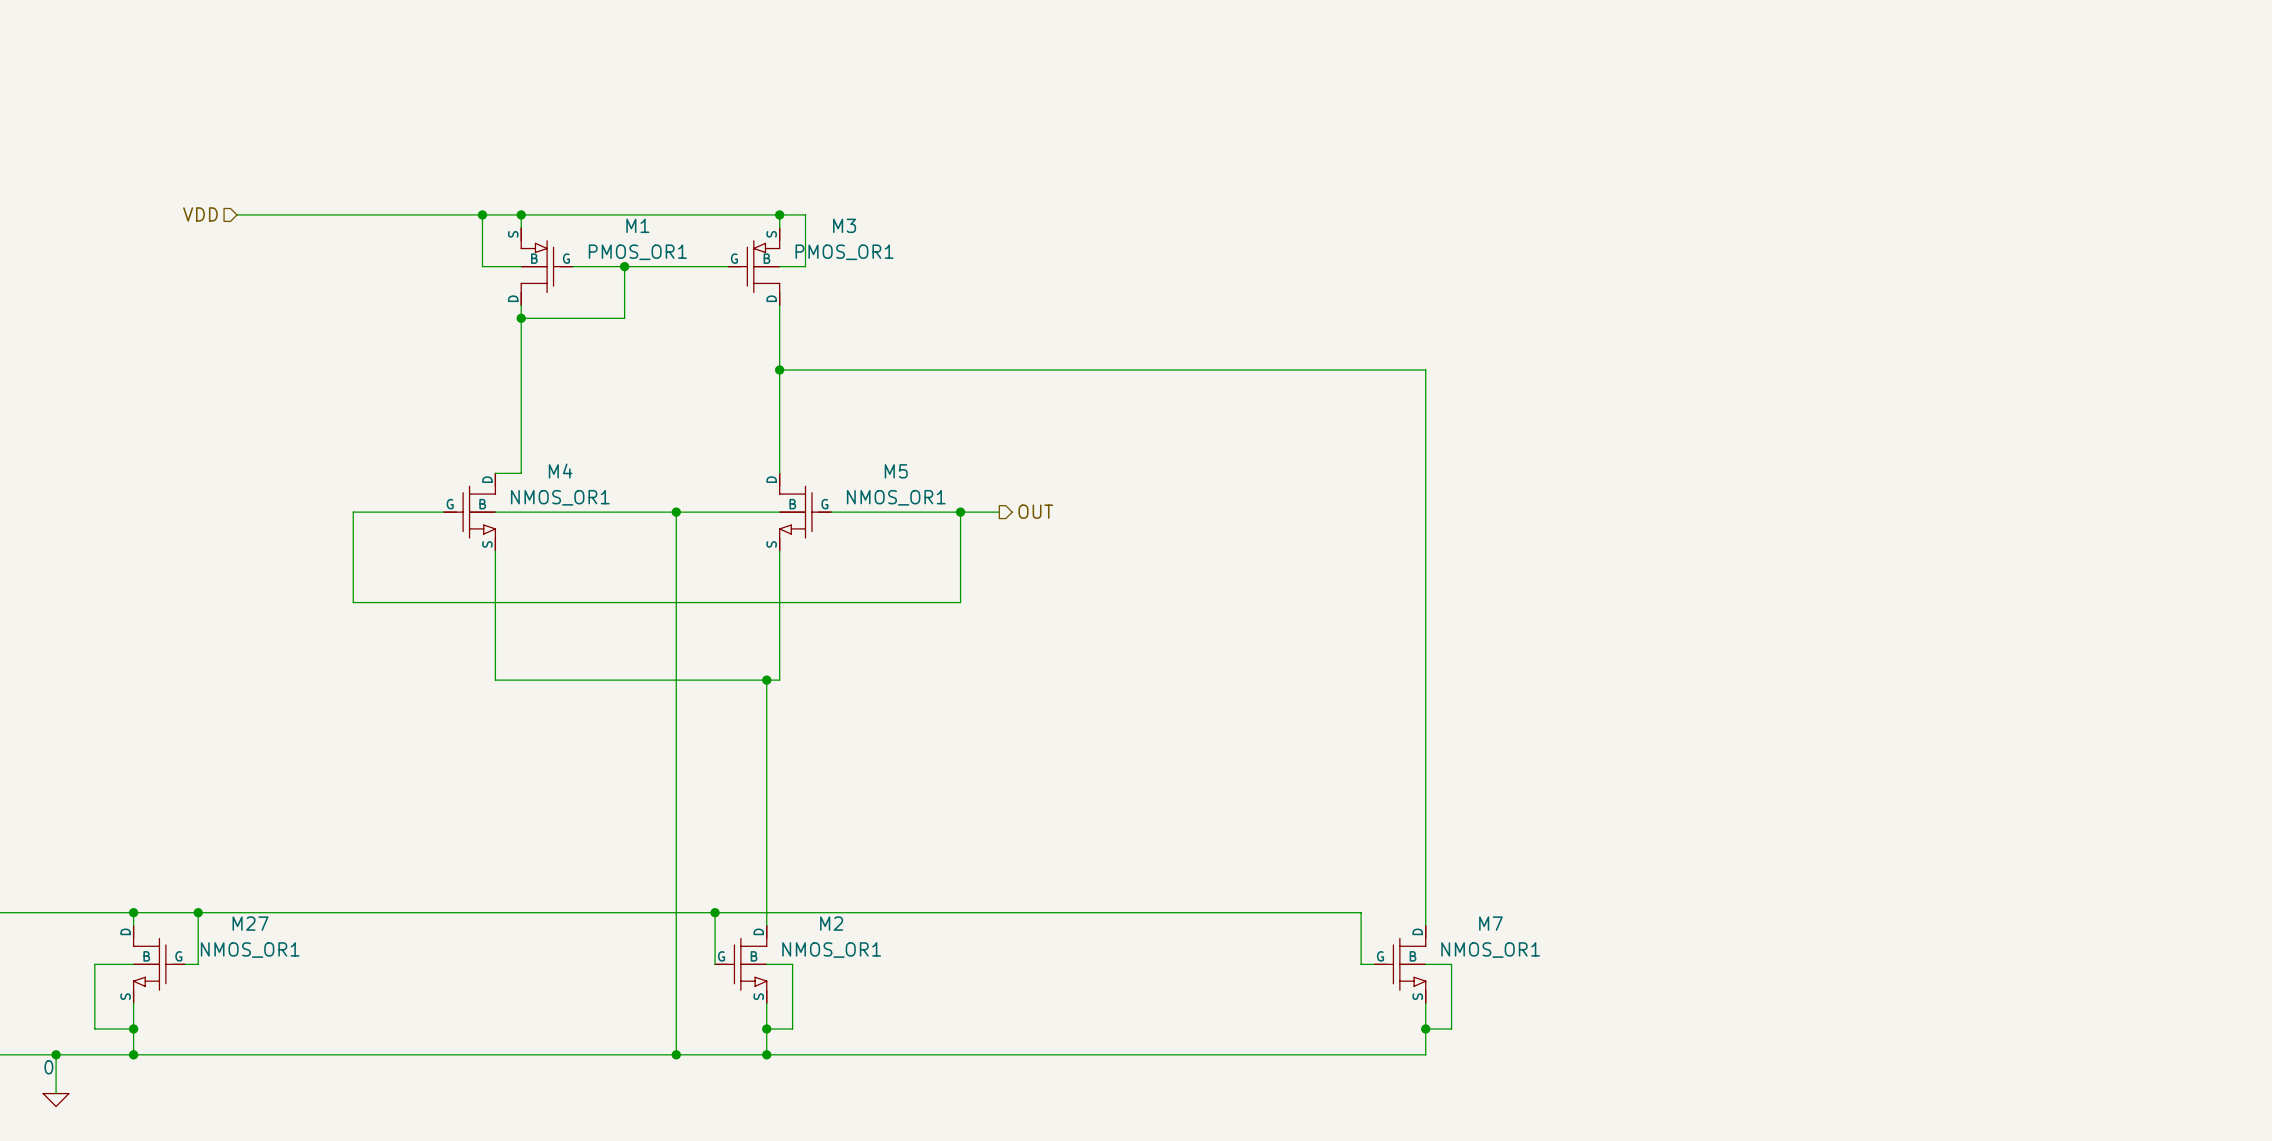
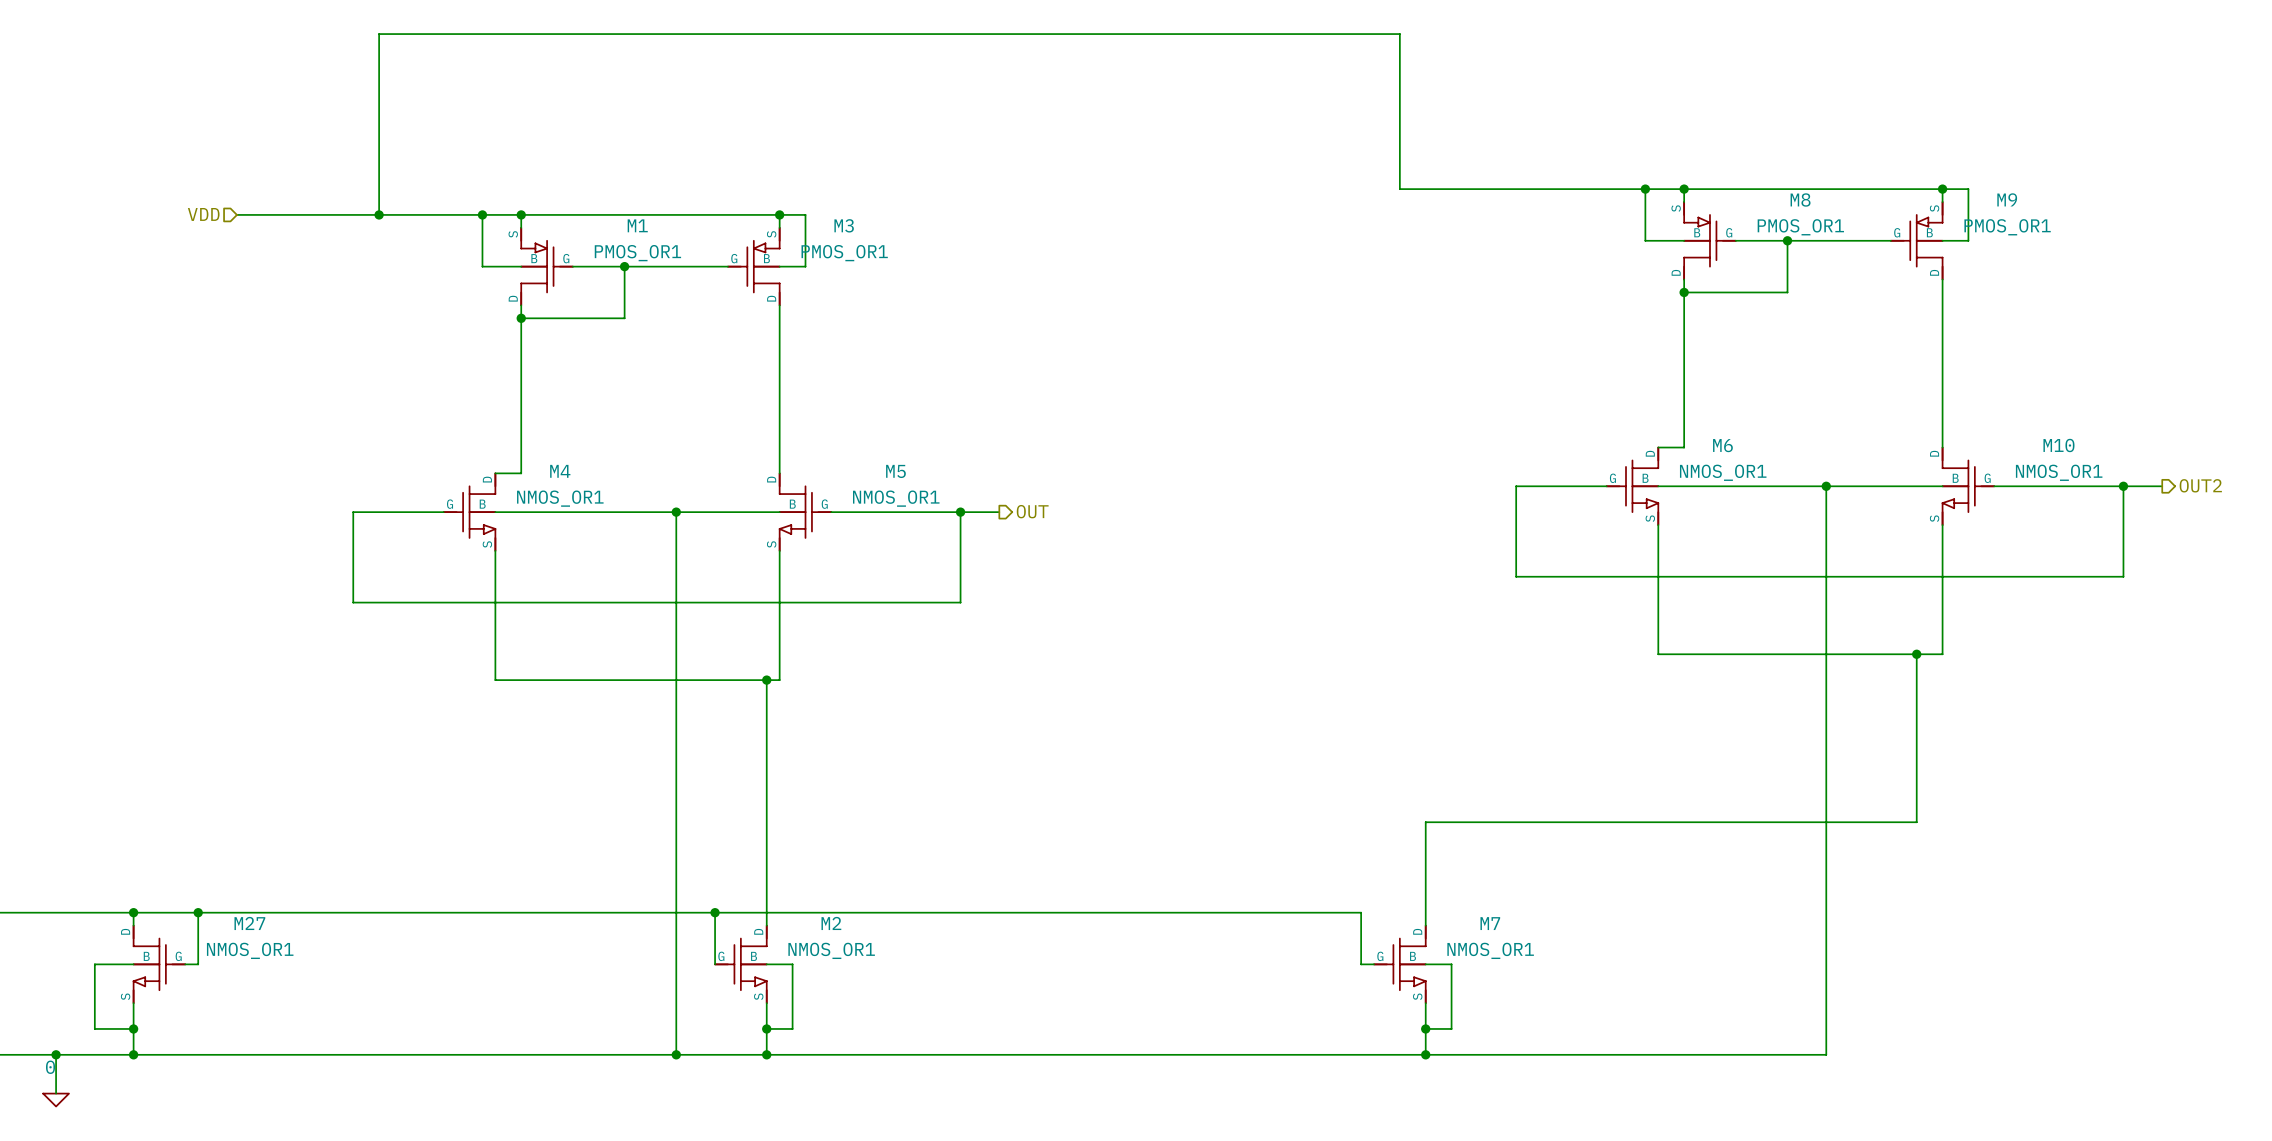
wire: none -> (1645, 189) (1645, 240) (1684, 240)
junction: none -> (1645, 189)
wire: none -> (1684, 189) (1684, 202)
junction: none -> (1684, 189)
wire: none -> (1942, 189) (1942, 202)
junction: none -> (1942, 189)
wire: none -> (379, 214) (379, 34) (1399, 34) (1399, 189) (1968, 189) (1968, 240) (1942, 240)
junction: none -> (379, 214)
M8: none -> PMOS_OR1 (1709, 240)
wire: none -> (1735, 240) (1890, 240)
wire: none -> (1787, 240) (1787, 292) (1684, 292)
junction: none -> (1787, 240)
M9: none -> PMOS_OR1 (1916, 240)
wire: none -> (1684, 279) (1684, 447) (1658, 447)
wire: none -> (1942, 279) (1942, 447)
junction: none -> (1684, 292)
wire: (779, 370) (1425, 370) (1425, 822) -> (1916, 654) (1916, 822) (1425, 822)
junction: (779, 370) -> none
hierarchical label: none -> OUT2 (2200, 485)
wire: none -> (1606, 486) (1516, 486) (1516, 576) (2123, 576) (2123, 486)
M6: none -> NMOS_OR1 (1632, 486)
wire: none -> (1658, 486) (1942, 486)
wire: none -> (1826, 486) (1826, 1054) (1425, 1054)
junction: none -> (1826, 486)
M10: none -> NMOS_OR1 (1968, 486)
wire: none -> (1994, 486) (2162, 486)
junction: none -> (2123, 486)
wire: none -> (1658, 525) (1658, 654) (1942, 654) (1942, 525)
junction: none -> (1916, 654)
junction: none -> (1425, 1054)

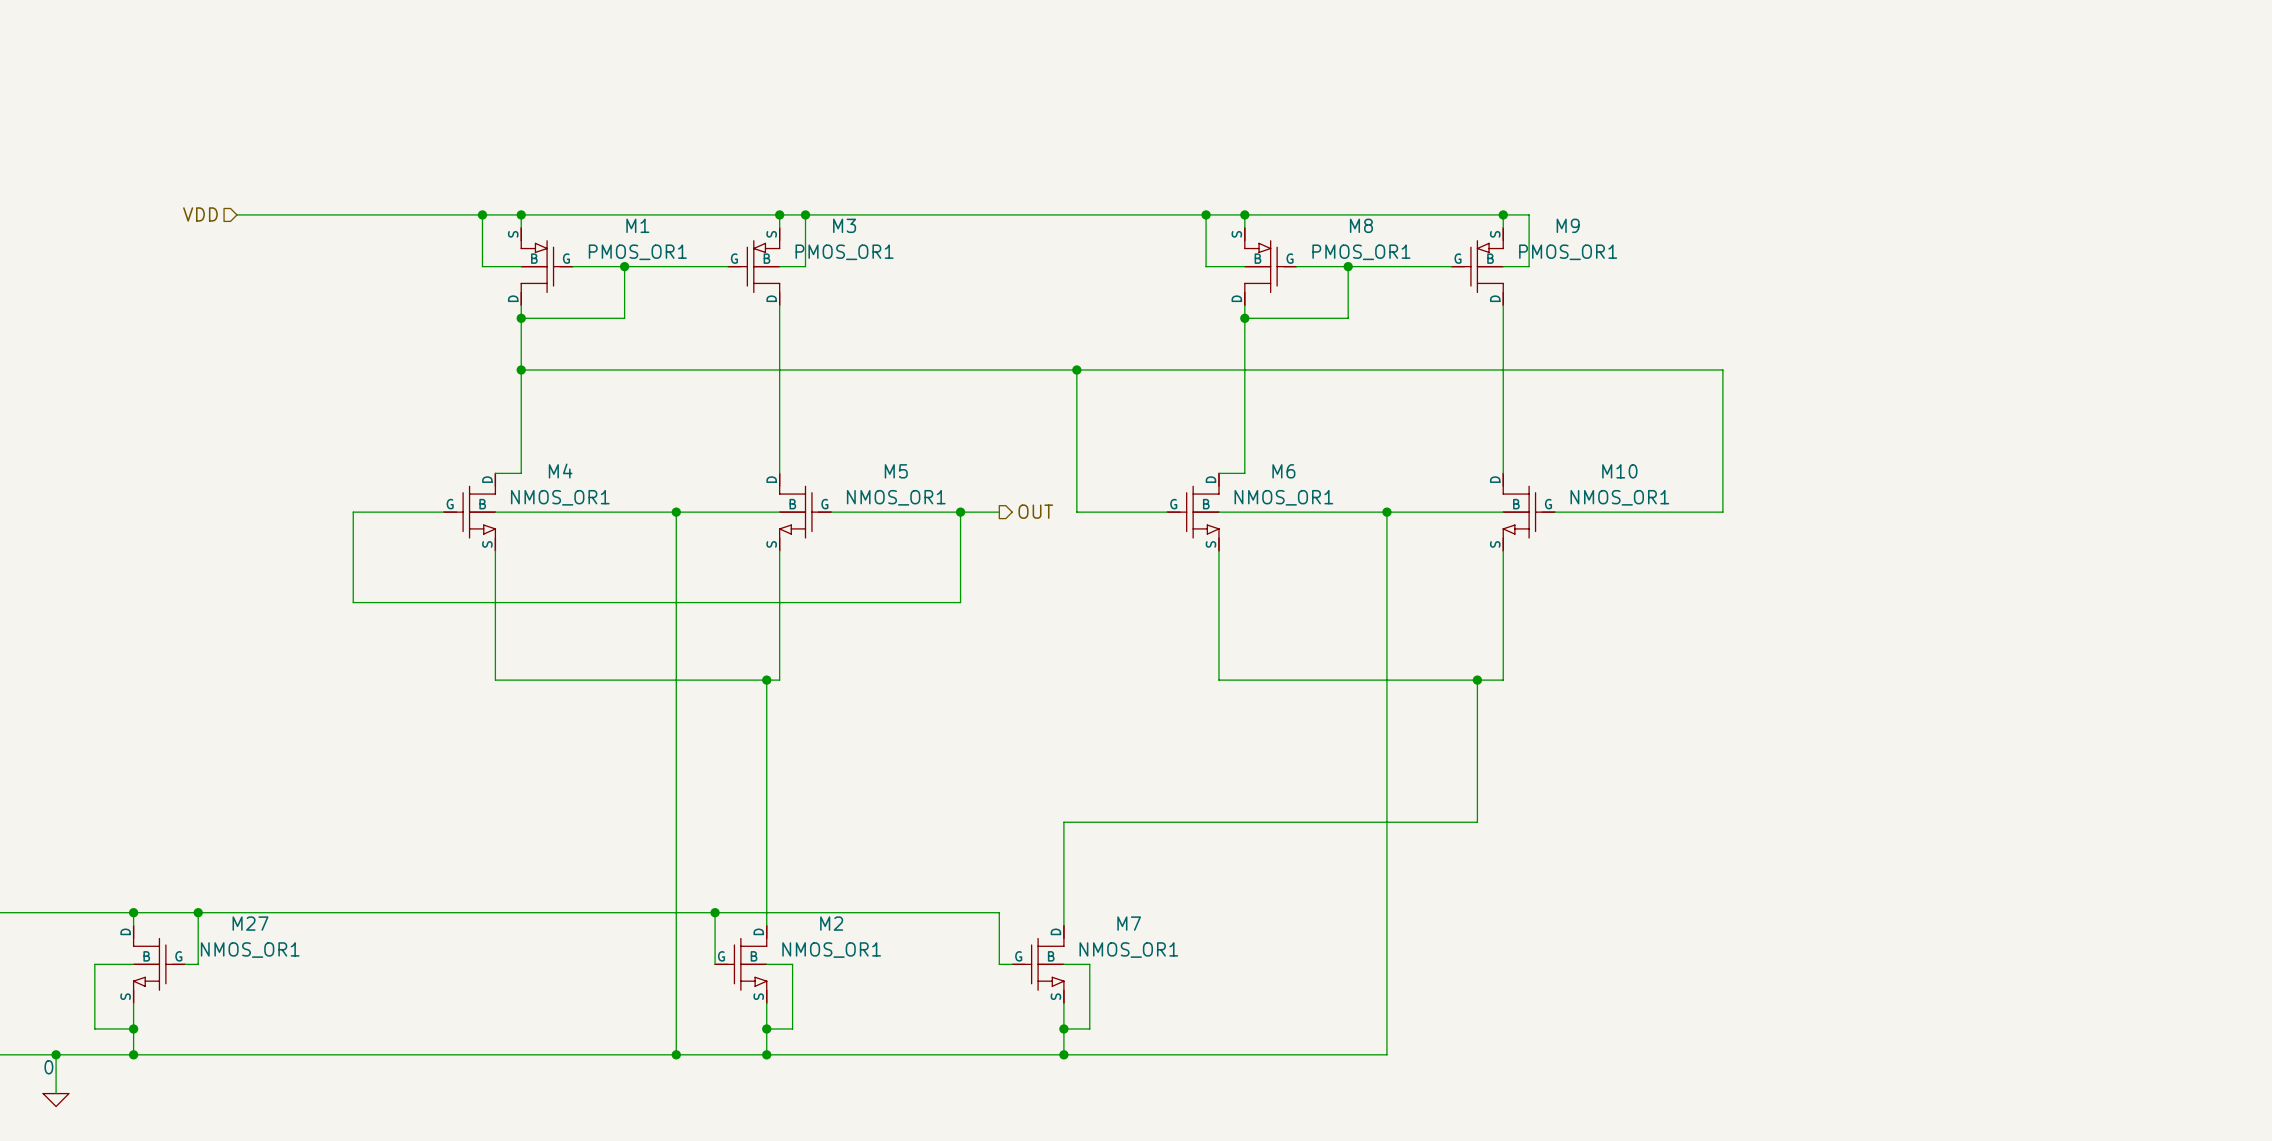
wire: (1645, 189) (1645, 240) (1684, 240) -> none
junction: (1645, 189) -> none
wire: (1684, 189) (1684, 202) -> (1503, 214) (1503, 227)
junction: (1684, 189) -> none
wire: (1942, 189) (1942, 202) -> none
junction: (1942, 189) -> none
wire: (379, 214) (379, 34) (1399, 34) (1399, 189) (1968, 189) (1968, 240) (1942, 240) -> none
junction: (379, 214) -> none
wire: none -> (805, 214) (1529, 214) (1529, 266) (1503, 266)
junction: none -> (805, 214)
wire: none -> (1206, 214) (1206, 266) (1244, 266)
junction: none -> (1206, 214)
wire: none -> (1244, 214) (1244, 227)
junction: none -> (1244, 214)
junction: none -> (1503, 214)
M8 position: (1709, 240) -> (1270, 266)
wire: (1735, 240) (1890, 240) -> none
wire: (1787, 240) (1787, 292) (1684, 292) -> none
junction: (1787, 240) -> none
M9 position: (1916, 240) -> (1477, 266)
wire: none -> (1296, 266) (1451, 266)
wire: none -> (1348, 266) (1348, 318) (1244, 318)
junction: none -> (1348, 266)
wire: (1684, 279) (1684, 447) (1658, 447) -> none
wire: (1942, 279) (1942, 447) -> none
junction: (1684, 292) -> none
wire: none -> (1244, 305) (1244, 473) (1218, 473)
wire: none -> (1503, 305) (1503, 473)
junction: none -> (1244, 318)
wire: none -> (521, 370) (1722, 370) (1722, 512) (1554, 512)
junction: none -> (521, 370)
wire: none -> (1076, 370) (1076, 512) (1167, 512)
junction: none -> (1076, 370)
hierarchical label: OUT2 (2200, 485) -> none
wire: (1606, 486) (1516, 486) (1516, 576) (2123, 576) (2123, 486) -> none
M6 position: (1632, 486) -> (1193, 512)
wire: (1658, 486) (1942, 486) -> none
wire: (1826, 486) (1826, 1054) (1386, 1054) -> (1386, 512) (1386, 1054)
junction: (1826, 486) -> none
M10 position: (1968, 486) -> (1529, 512)
wire: (1994, 486) (2162, 486) -> none
junction: (2123, 486) -> none
wire: none -> (1218, 512) (1503, 512)
junction: none -> (1386, 512)
wire: (1658, 525) (1658, 654) (1942, 654) (1942, 525) -> none
wire: none -> (1218, 550) (1218, 680) (1503, 680) (1503, 550)
wire: (1916, 654) (1916, 822) (1477, 822) -> (1477, 680) (1477, 822)
junction: (1916, 654) -> none
junction: none -> (1477, 680)
wire: (1425, 822) (1425, 925) -> (1425, 822) (1063, 822) (1063, 925)
wire: (999, 912) (1361, 912) (1361, 964) (1374, 964) -> (999, 912) (999, 964) (1012, 964)
wire: none -> (1063, 964) (1089, 964) (1089, 1028) (1063, 1028)
M7 position: (1399, 964) -> (1038, 964)
wire: (1425, 964) (1451, 964) (1451, 1028) (1425, 1028) -> none
wire: none -> (1063, 1003) (1063, 1054)
wire: (1425, 1003) (1425, 1054) -> none
junction: none -> (1063, 1028)
junction: (1425, 1028) -> none
junction: none -> (1063, 1054)
junction: (1425, 1054) -> none

